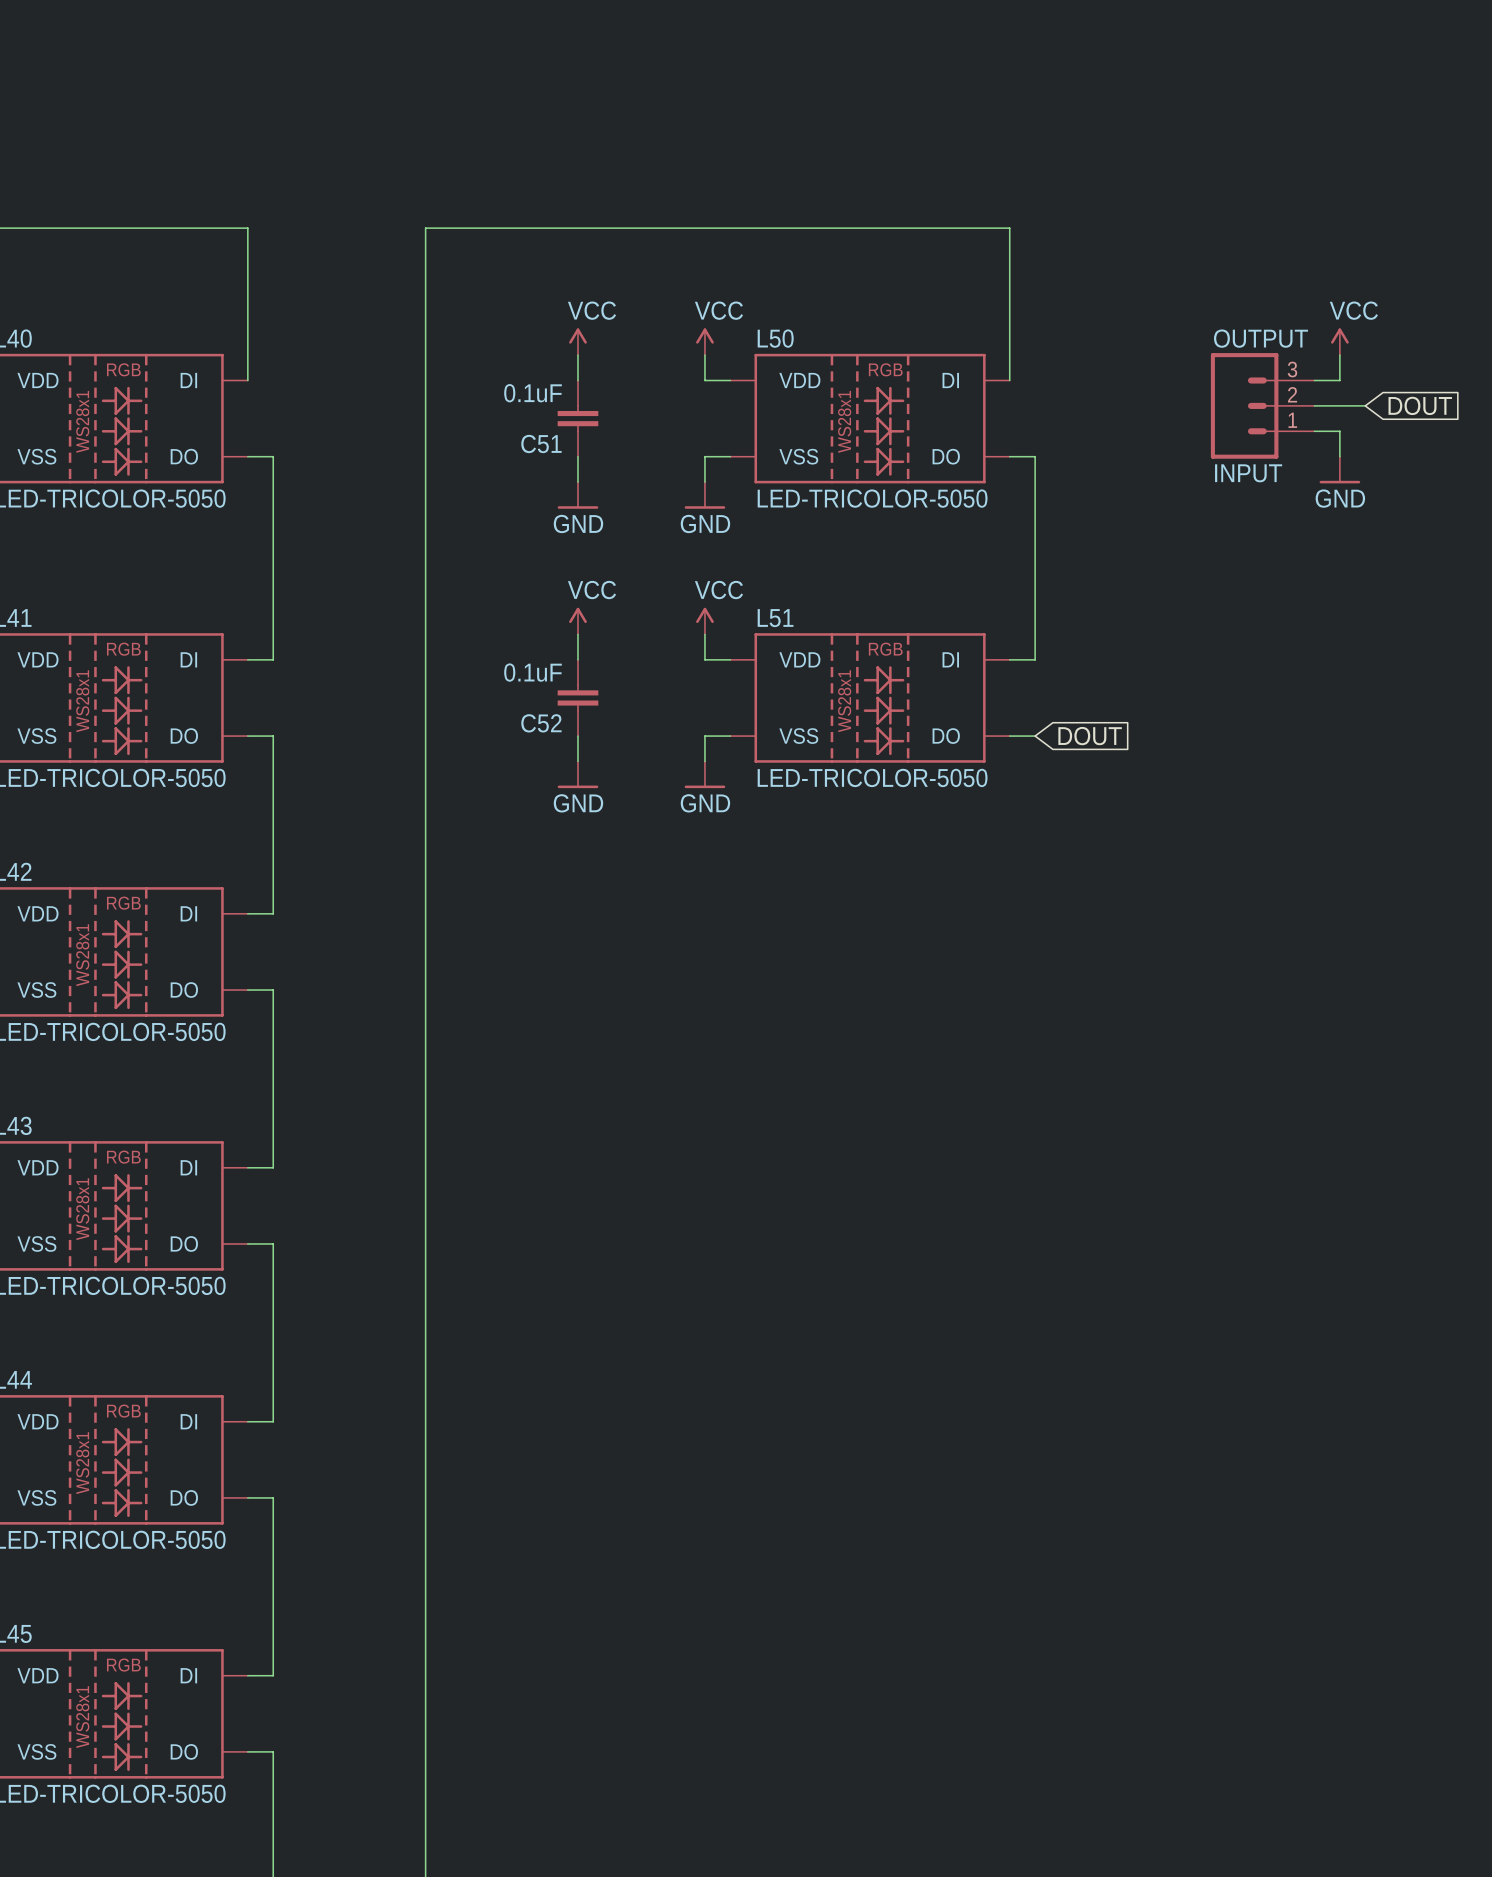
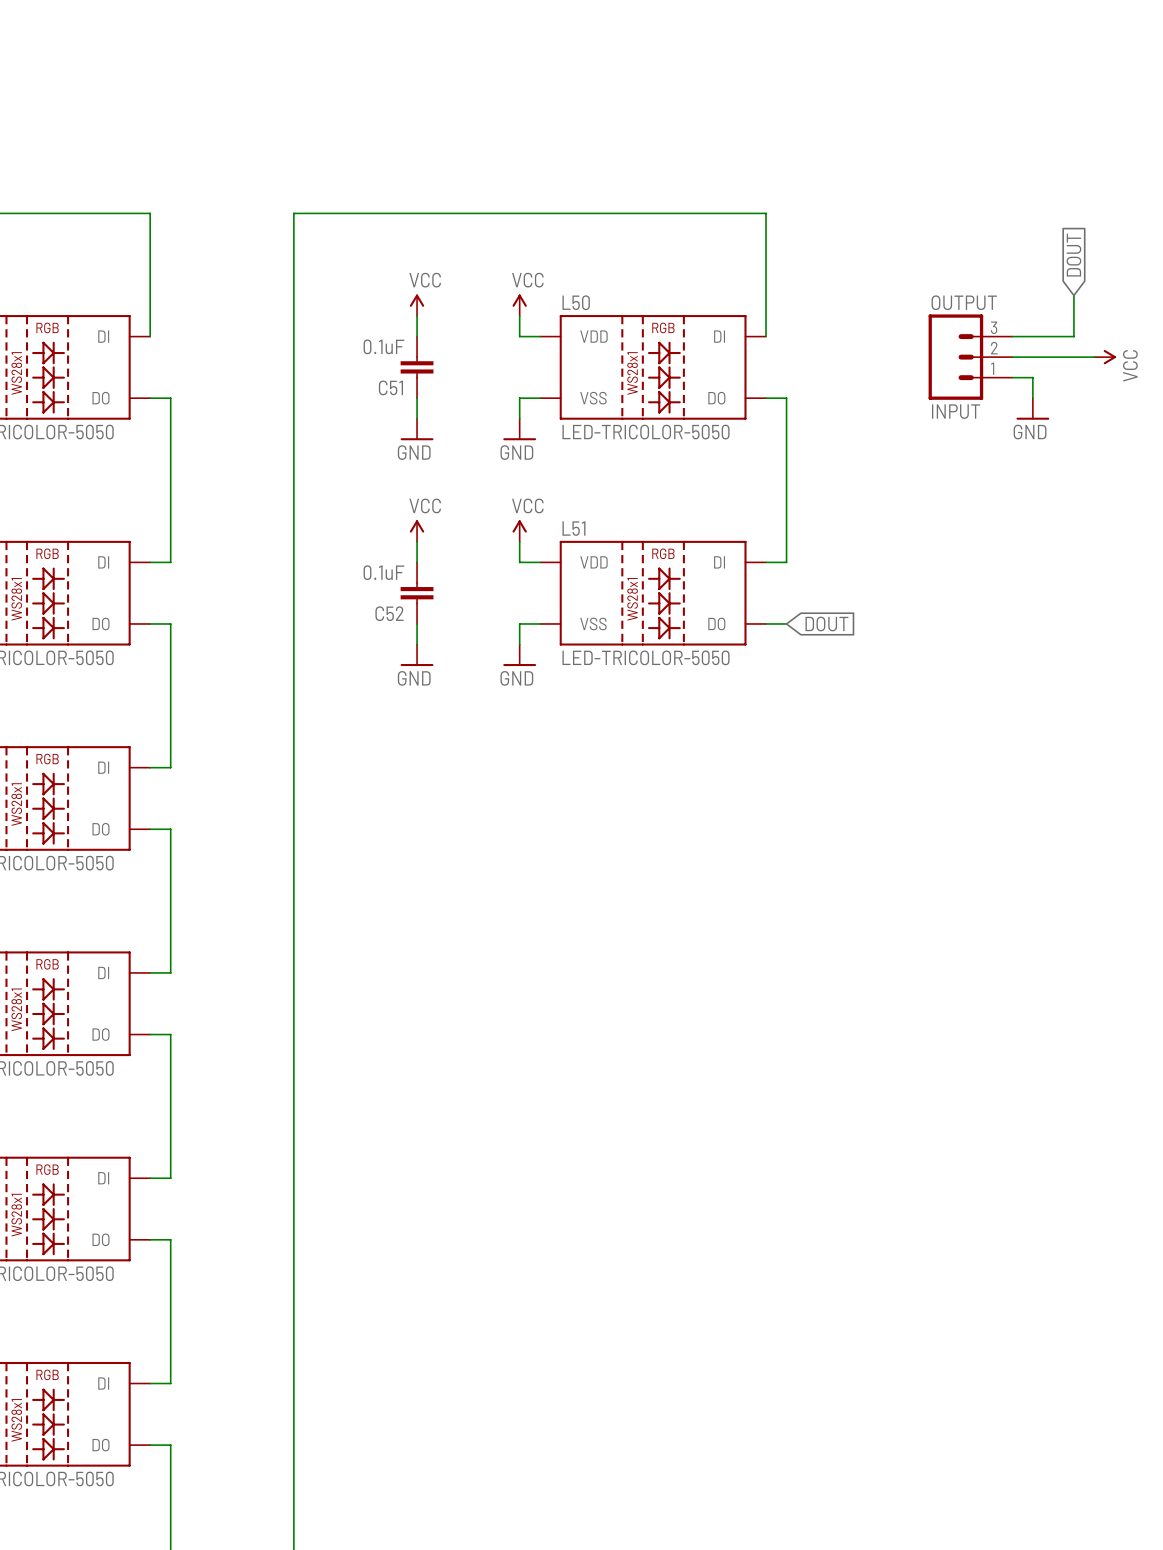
power symbol rotation: 0° (1339, 336) -> 90° clockwise (1109, 357)
power symbol position: VCC (1339, 341) -> VCC (1105, 357)
wire: (1339, 355) (1339, 380) -> (1073, 295) (1073, 336) (1032, 336)
wire: none -> (1053, 357) (1094, 357)
global label rotation: 0° (1420, 405) -> 90° counterclockwise (1073, 255)
global label position: DOUT (1420, 405) -> DOUT (1073, 255)

